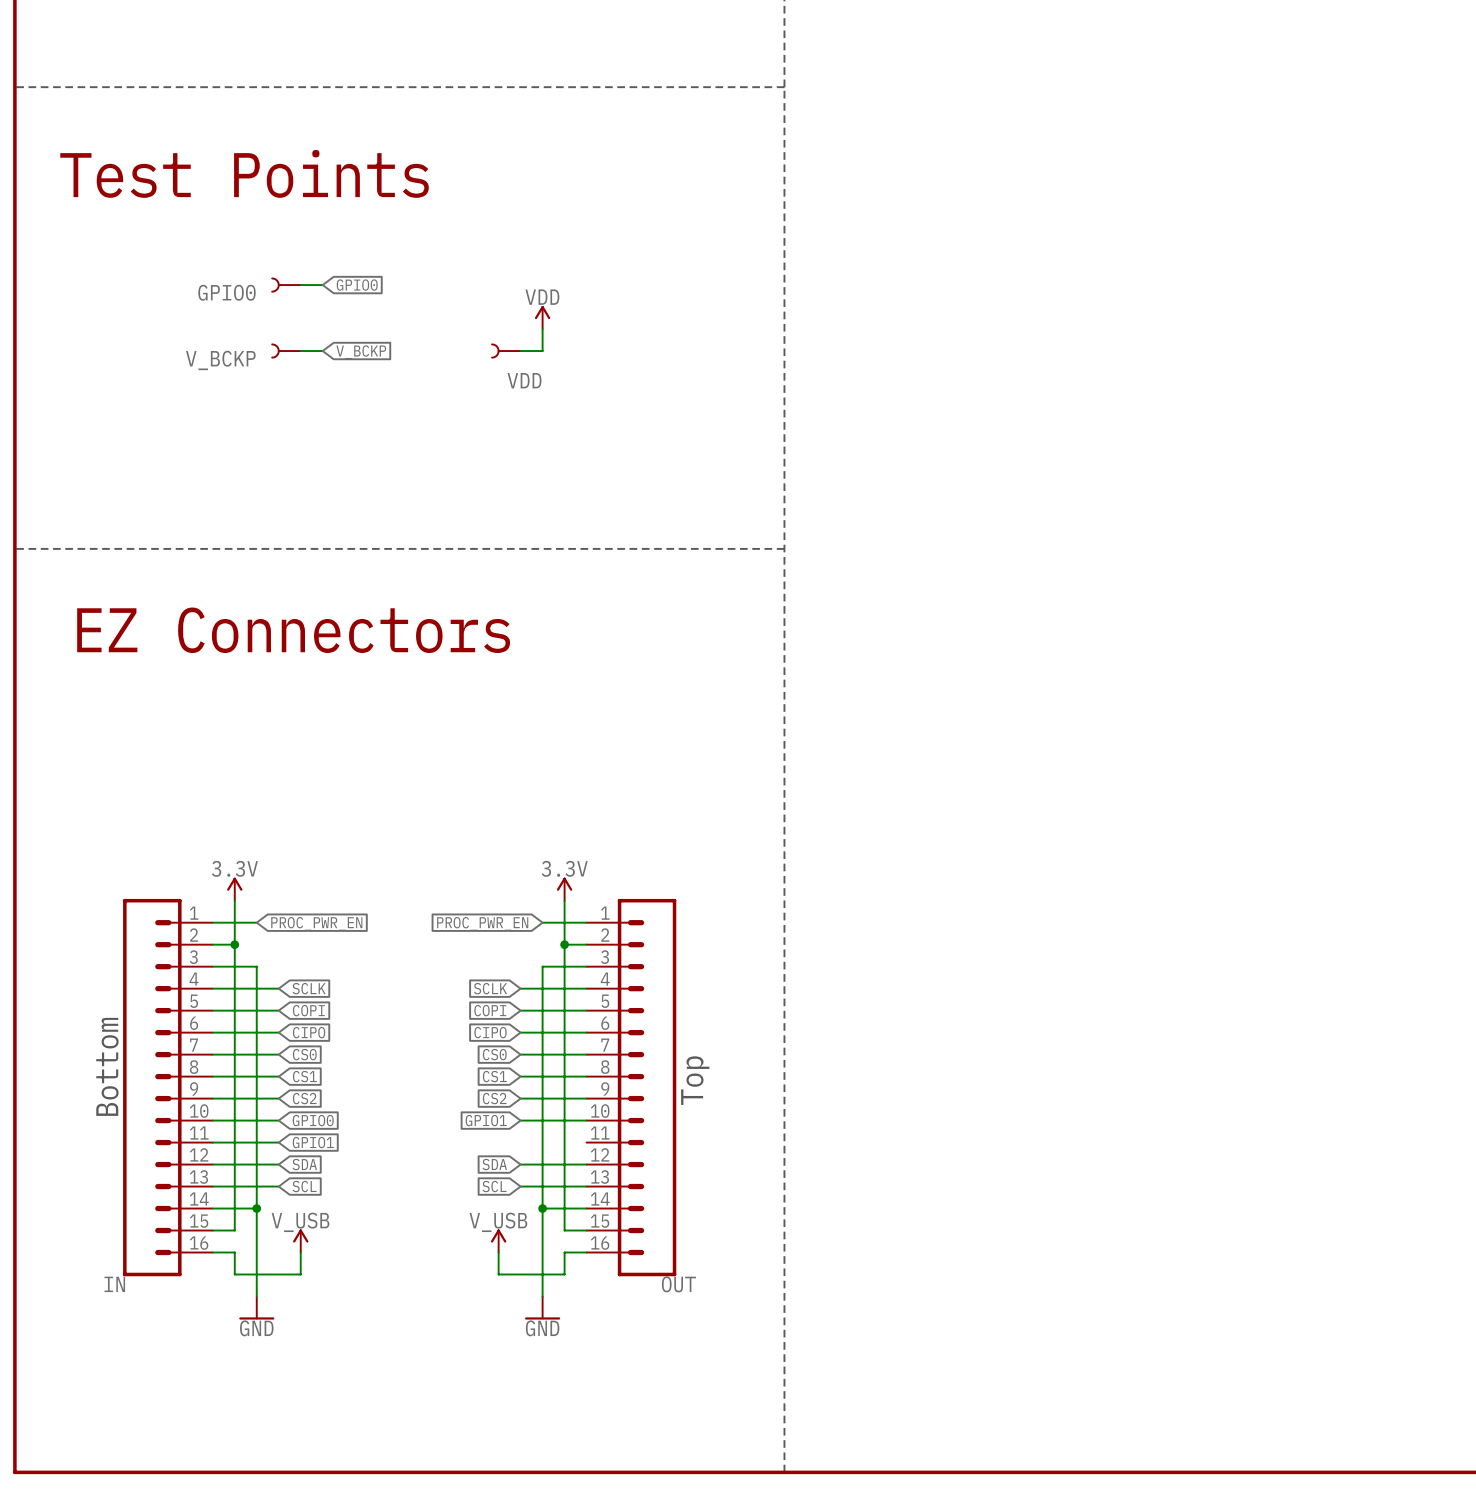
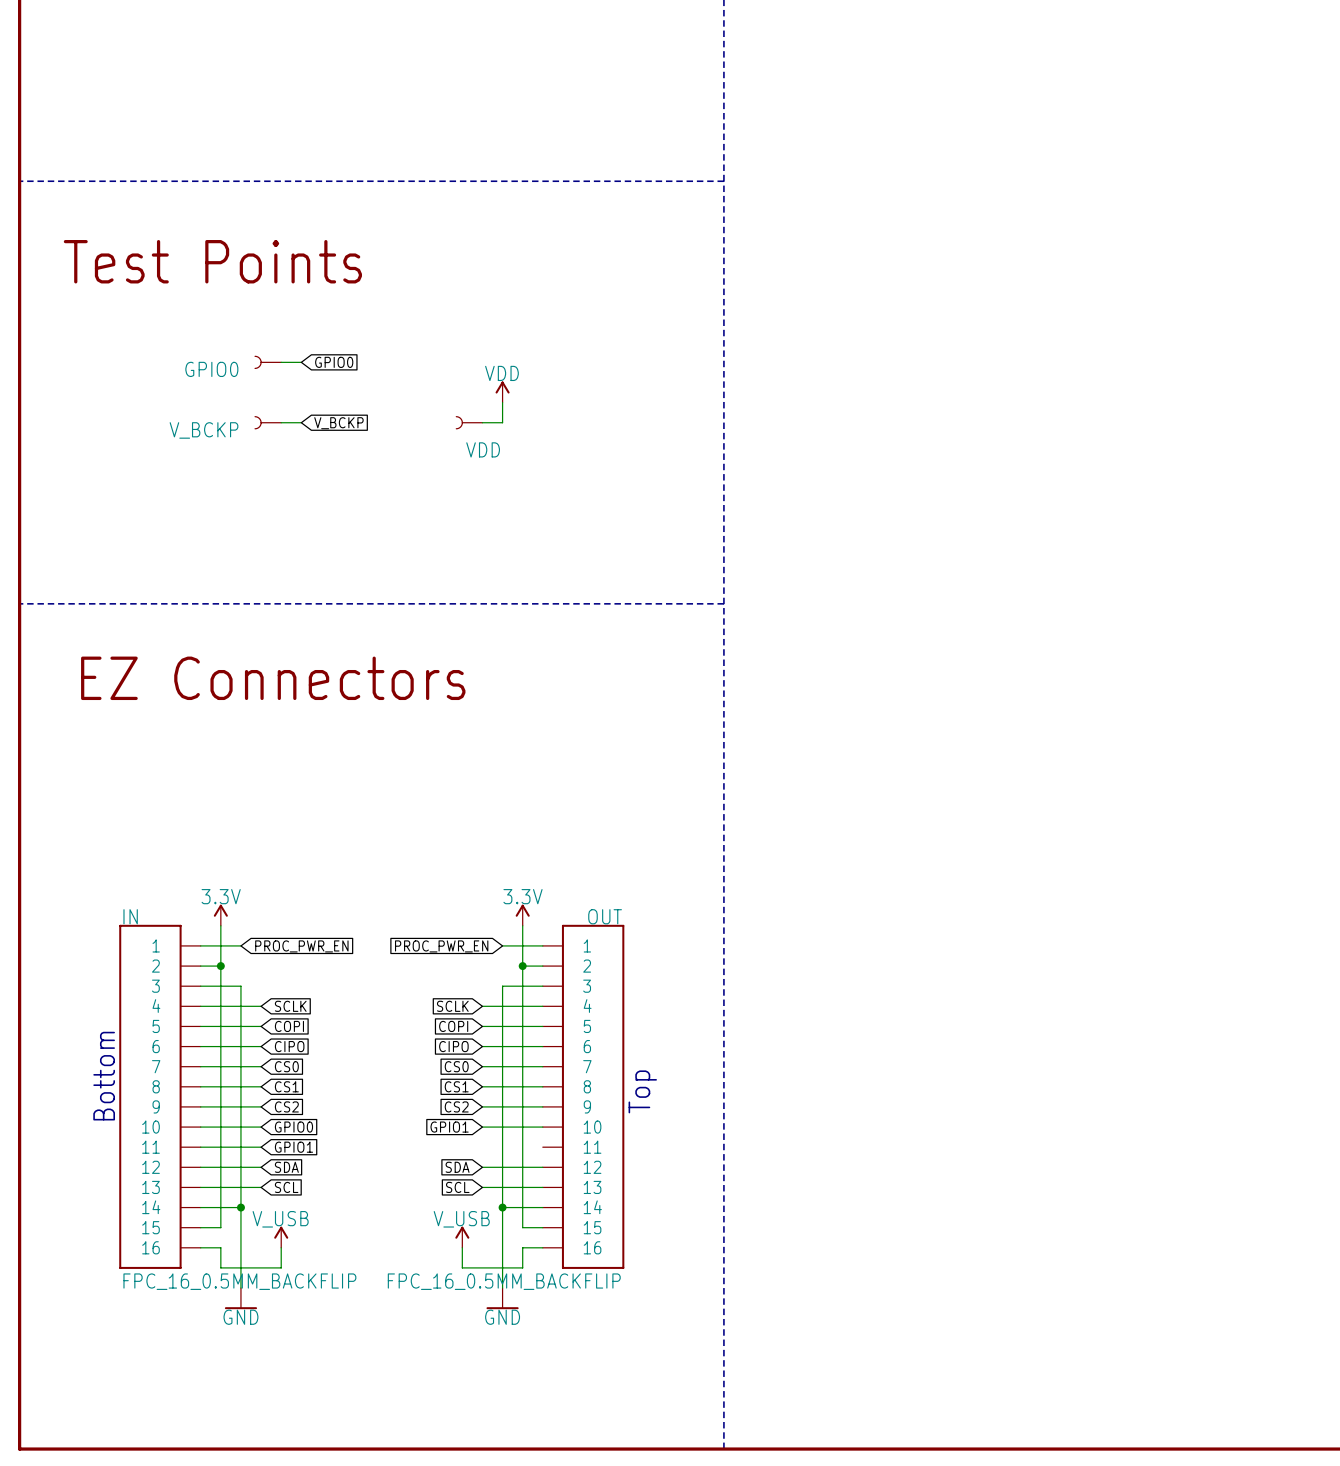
IN symbol: [123, 898, 213, 1277] -> [119, 924, 201, 1269]
OUT symbol: [586, 898, 677, 1277] -> [542, 924, 625, 1269]
IN name position: IN (114, 1284) -> IN (130, 916)
OUT name position: OUT (678, 1284) -> OUT (605, 916)
IN value: none -> FPC_16_0.5MM_BACKFLIP (239, 1281)
OUT value: none -> FPC_16_0.5MM_BACKFLIP (504, 1281)

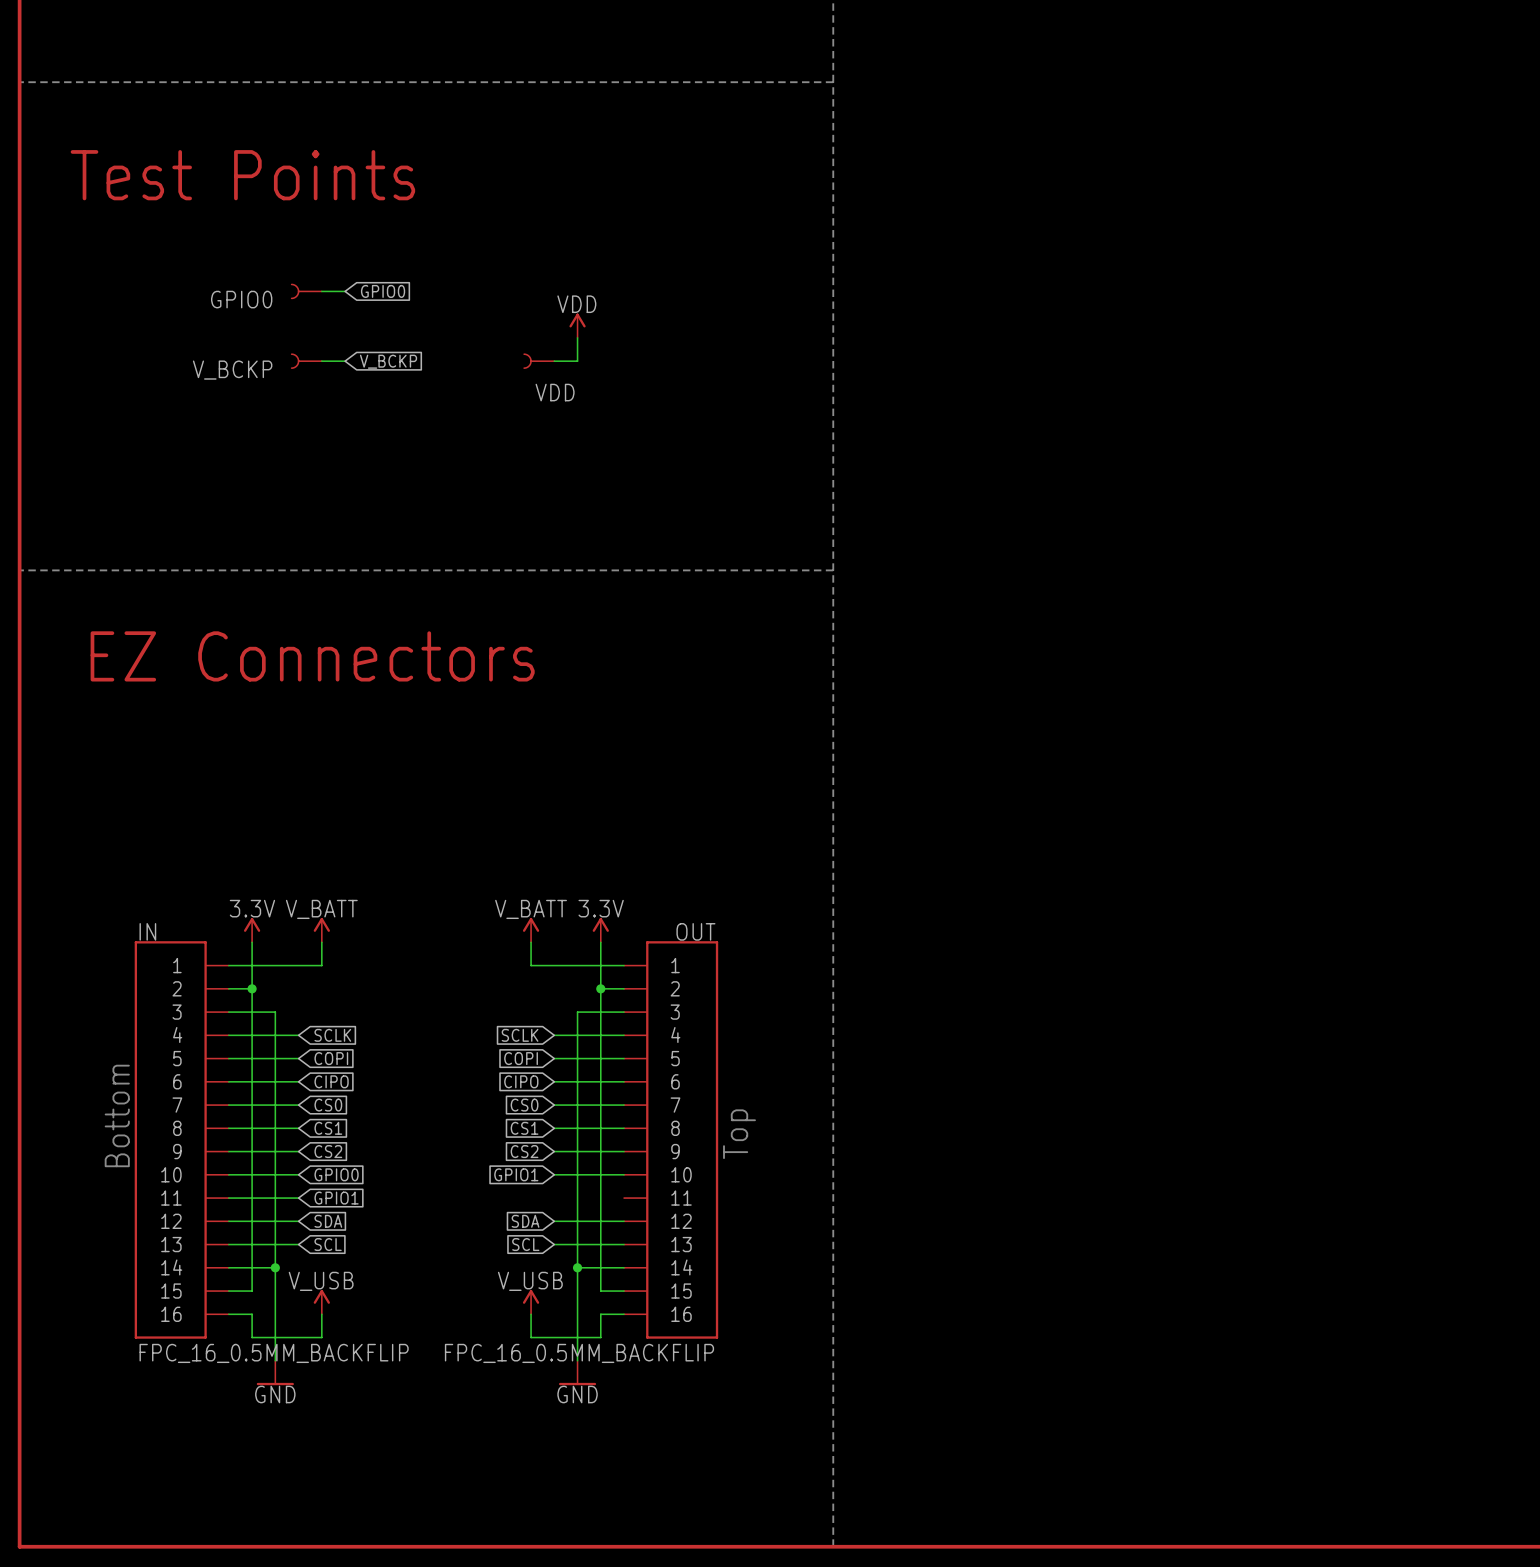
power symbol: none -> V_BATT (321, 930)
power symbol: none -> V_BATT (531, 930)
wire: none -> (321, 942) (321, 965) (275, 965)
wire: none -> (531, 942) (531, 965) (577, 965)
global label: PROC_PWR_EN (301, 946) -> none
global label: PROC_PWR_EN (441, 946) -> none

